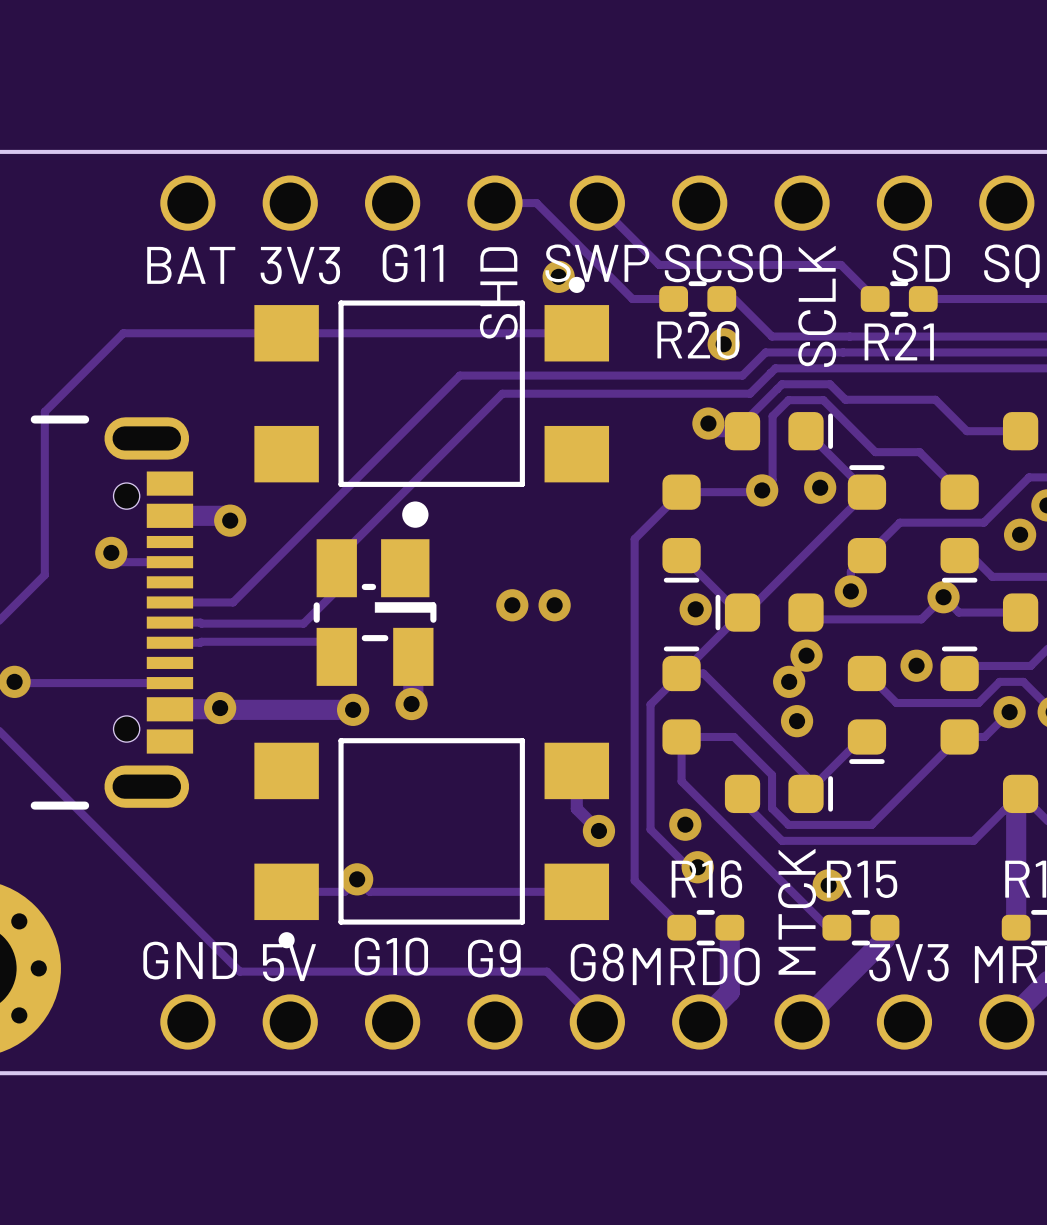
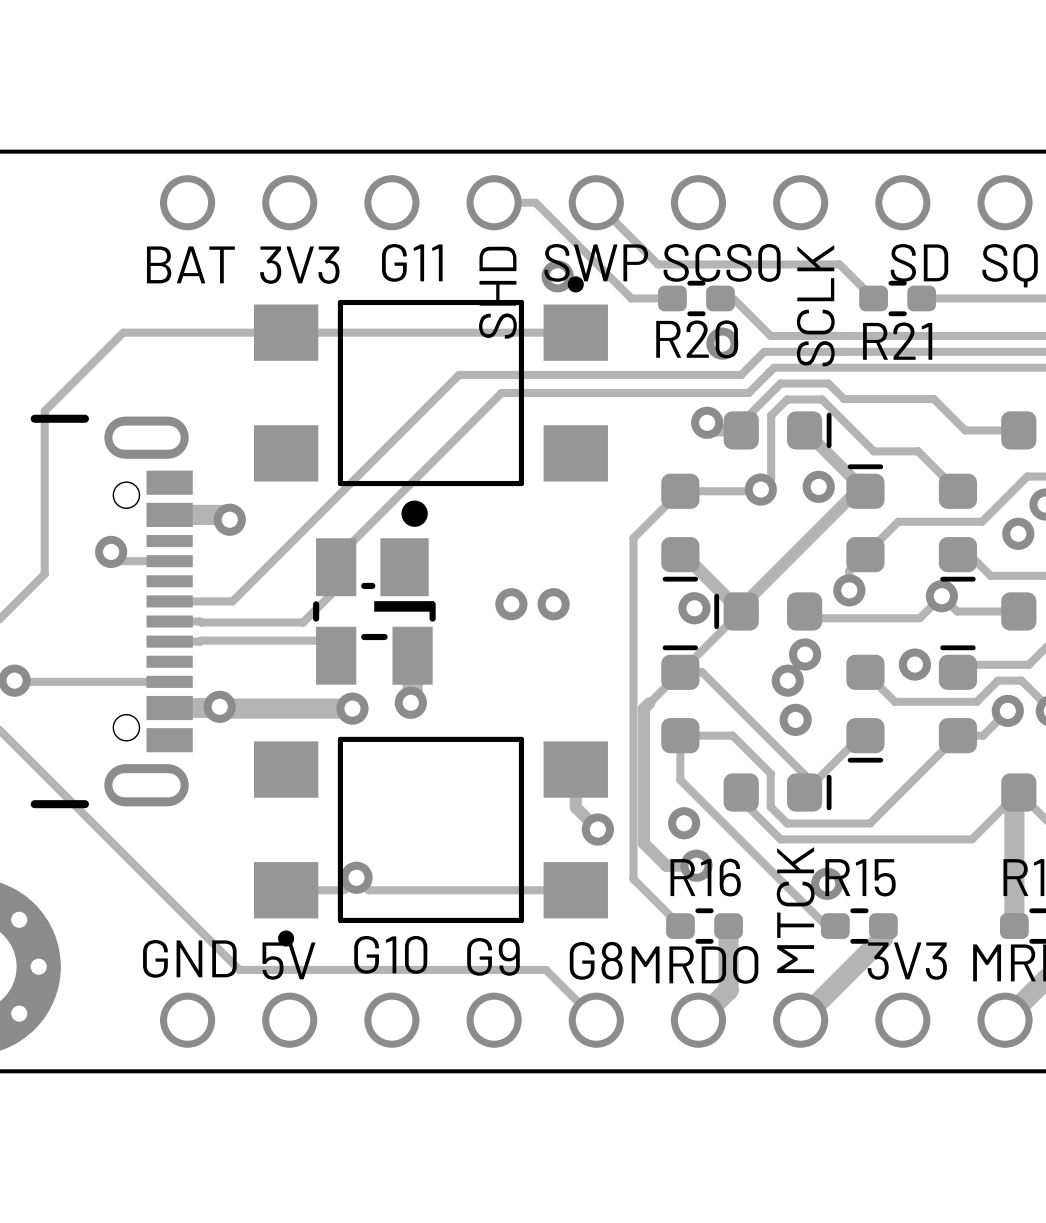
track: (806, 431) (866, 492) (746, 612) -> (804, 430) (865, 491) (856, 491) (741, 606) (741, 611) (684, 554) (680, 554)
track: (650, 704) (650, 829) (688, 867) -> (649, 703) (643, 708) (643, 843) (666, 865) (696, 865)

